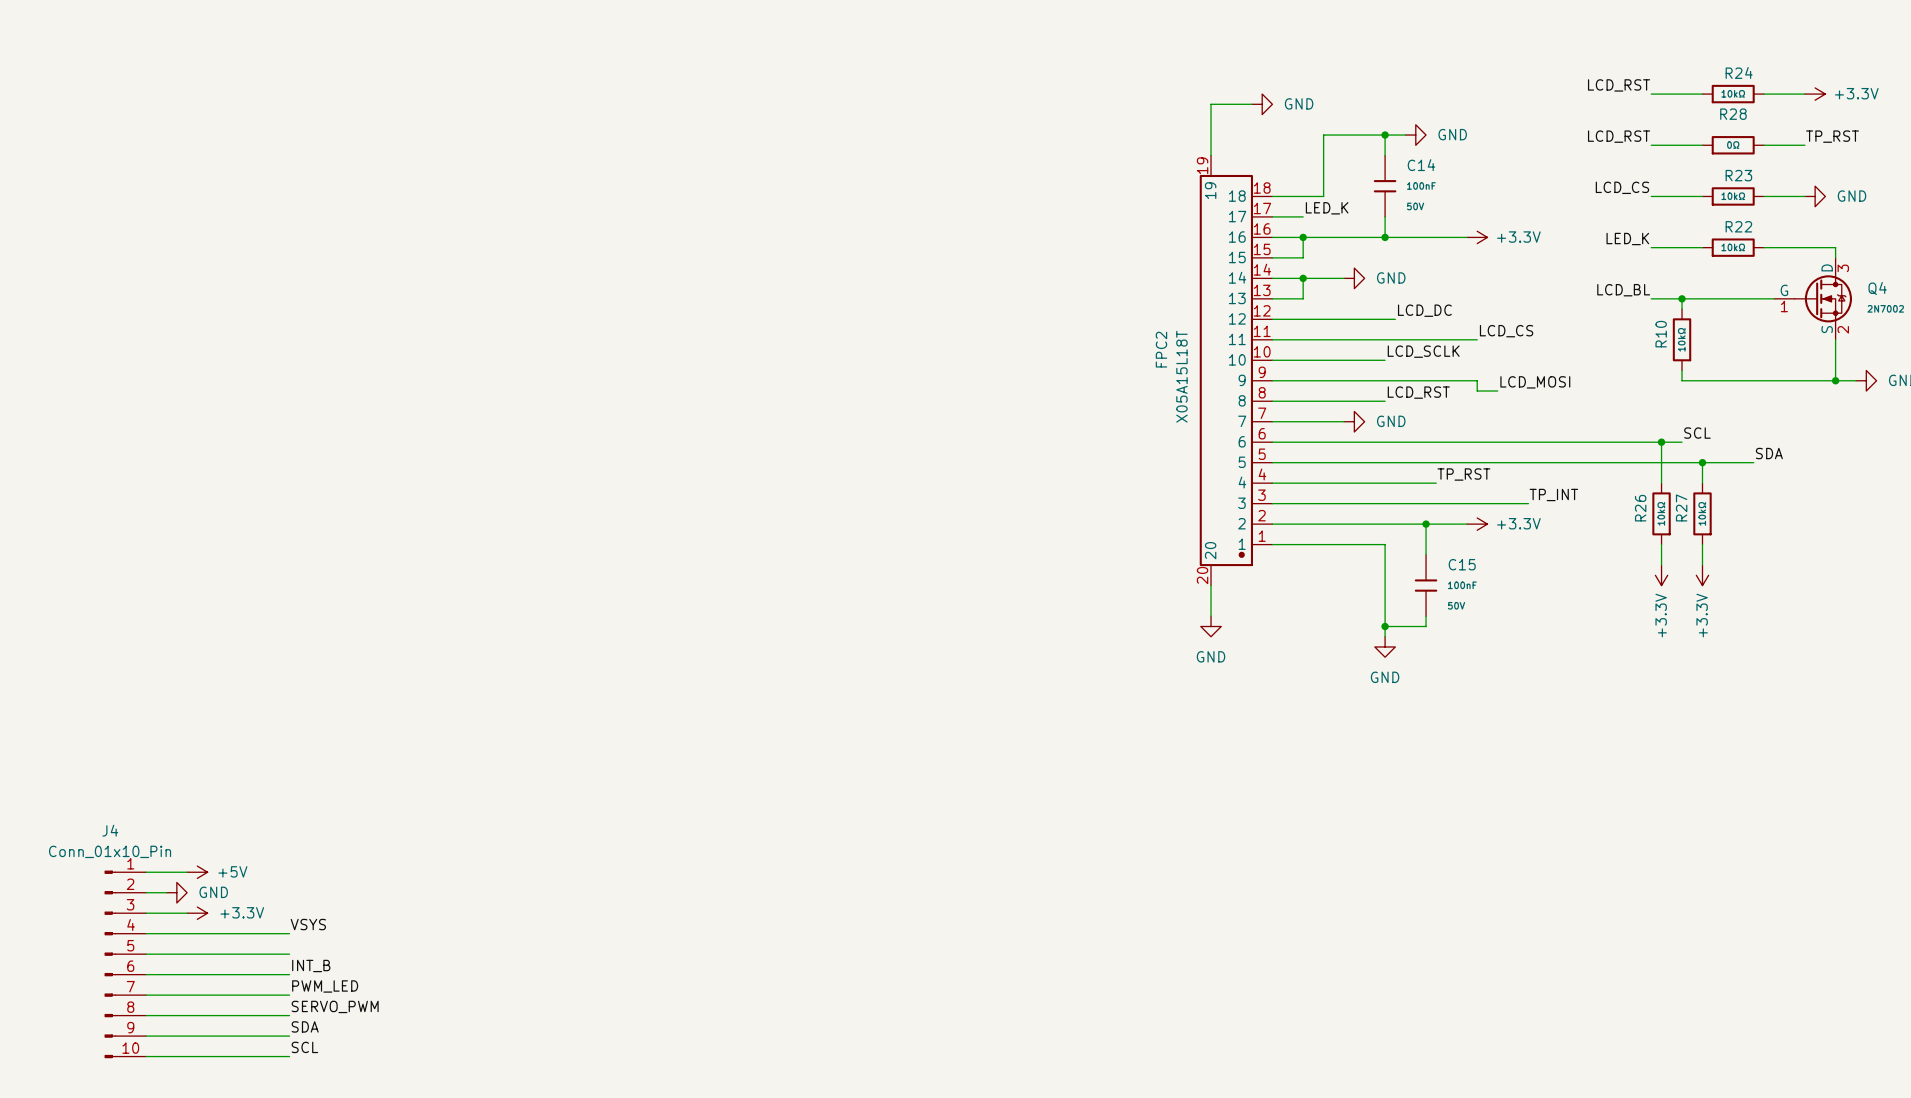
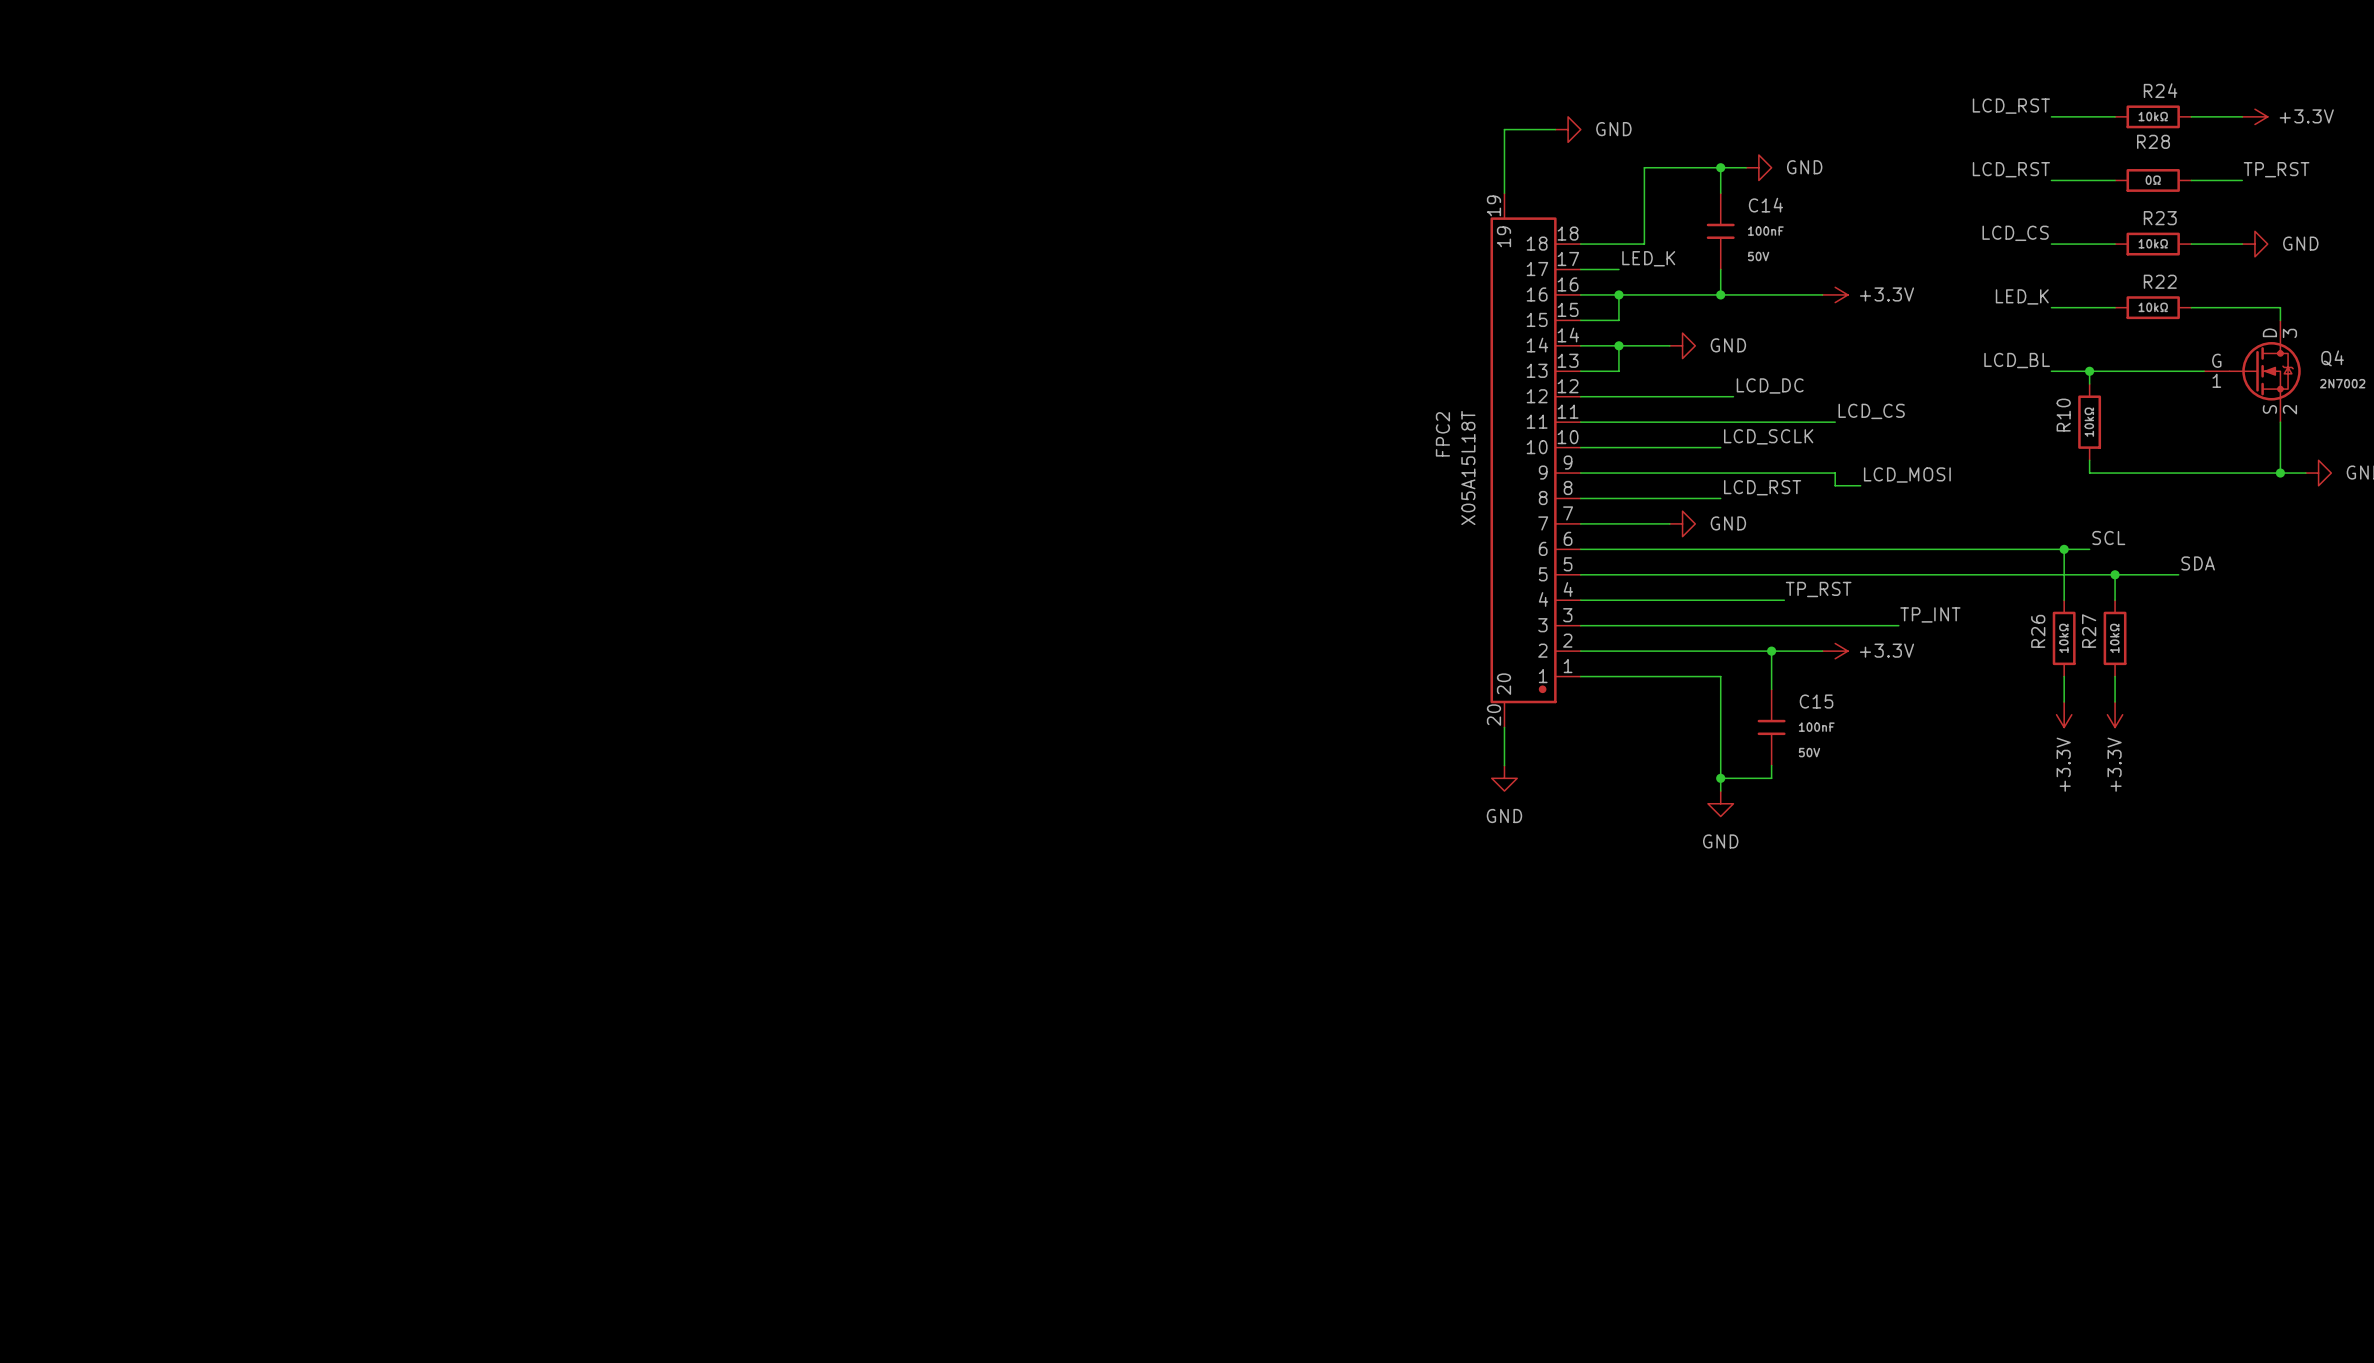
wire: (146, 872) (187, 872) -> none
power symbol: +5V (197, 872) -> none
wire: (146, 892) (166, 892) -> none
power symbol: GND (176, 892) -> none
wire: (146, 913) (187, 913) -> none
power symbol: +3.3V (197, 913) -> none
label: VSYS (308, 924) -> none
wire: (146, 933) (289, 933) -> none
wire: (146, 954) (289, 954) -> none
J4: Conn_01x10_Pin (125, 964) -> none
label: INT_B (311, 965) -> none
wire: (146, 974) (289, 974) -> none
label: PWM_LED (325, 986) -> none
wire: (146, 995) (289, 995) -> none
label: SERVO_PWM (335, 1006) -> none
wire: (146, 1015) (289, 1015) -> none
label: SDA (305, 1026) -> none
wire: (146, 1036) (289, 1036) -> none
label: SCL (304, 1047) -> none
wire: (146, 1056) (289, 1056) -> none

